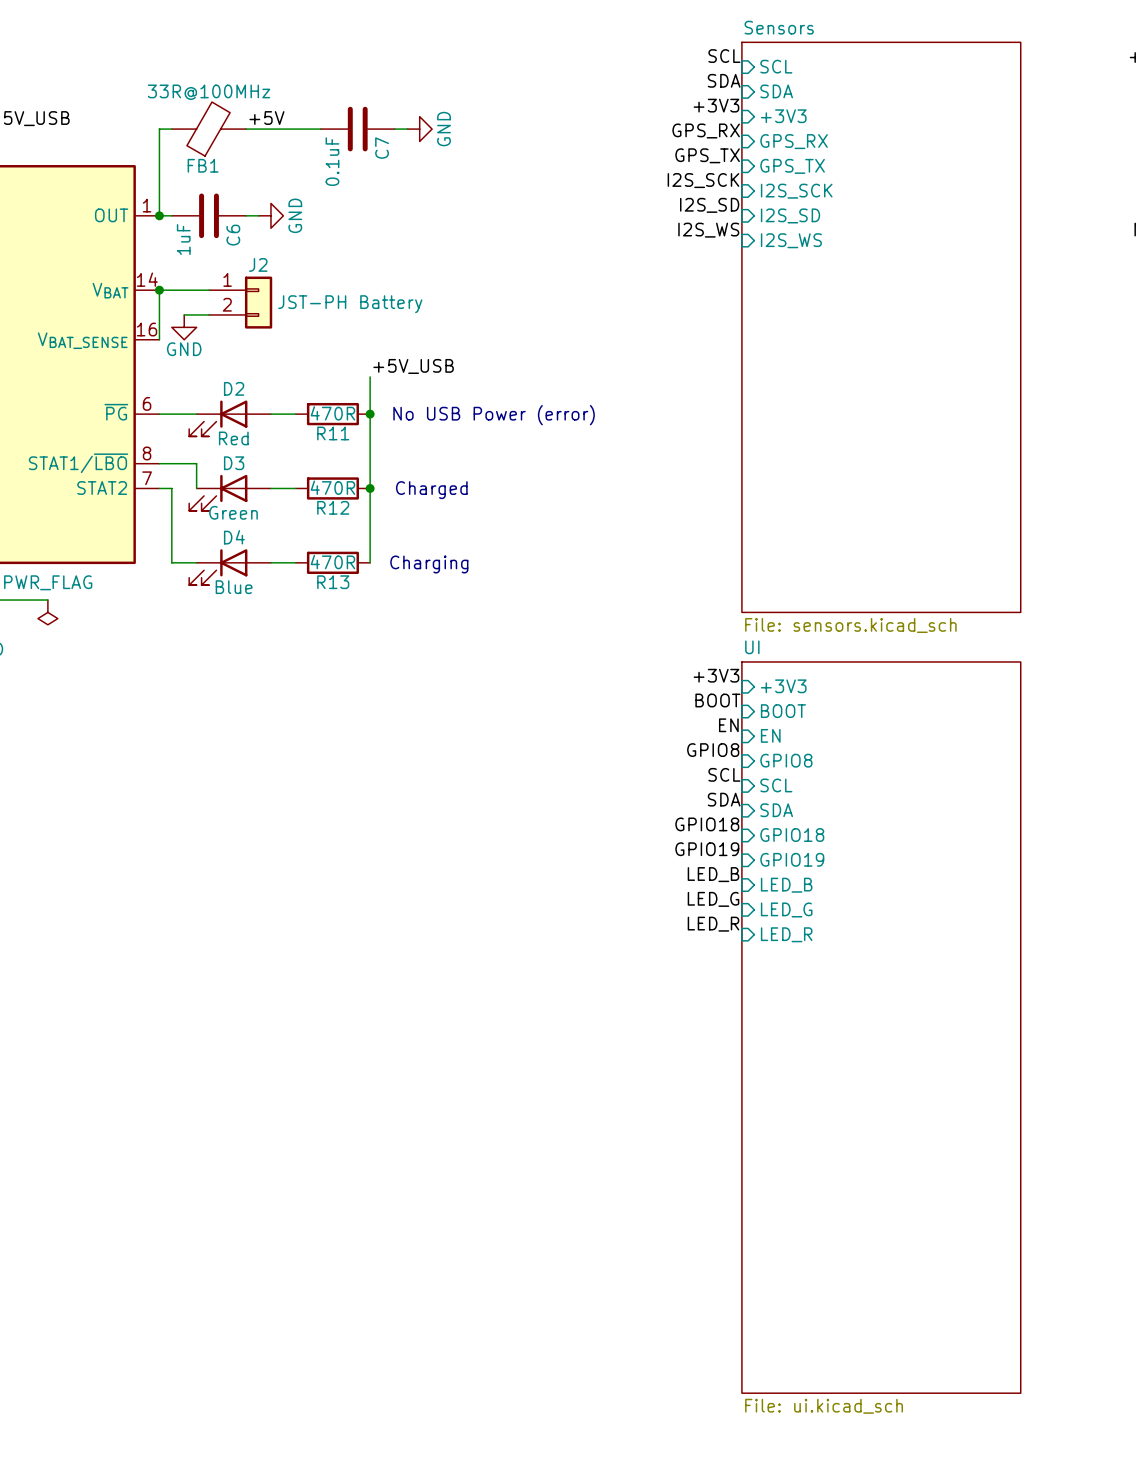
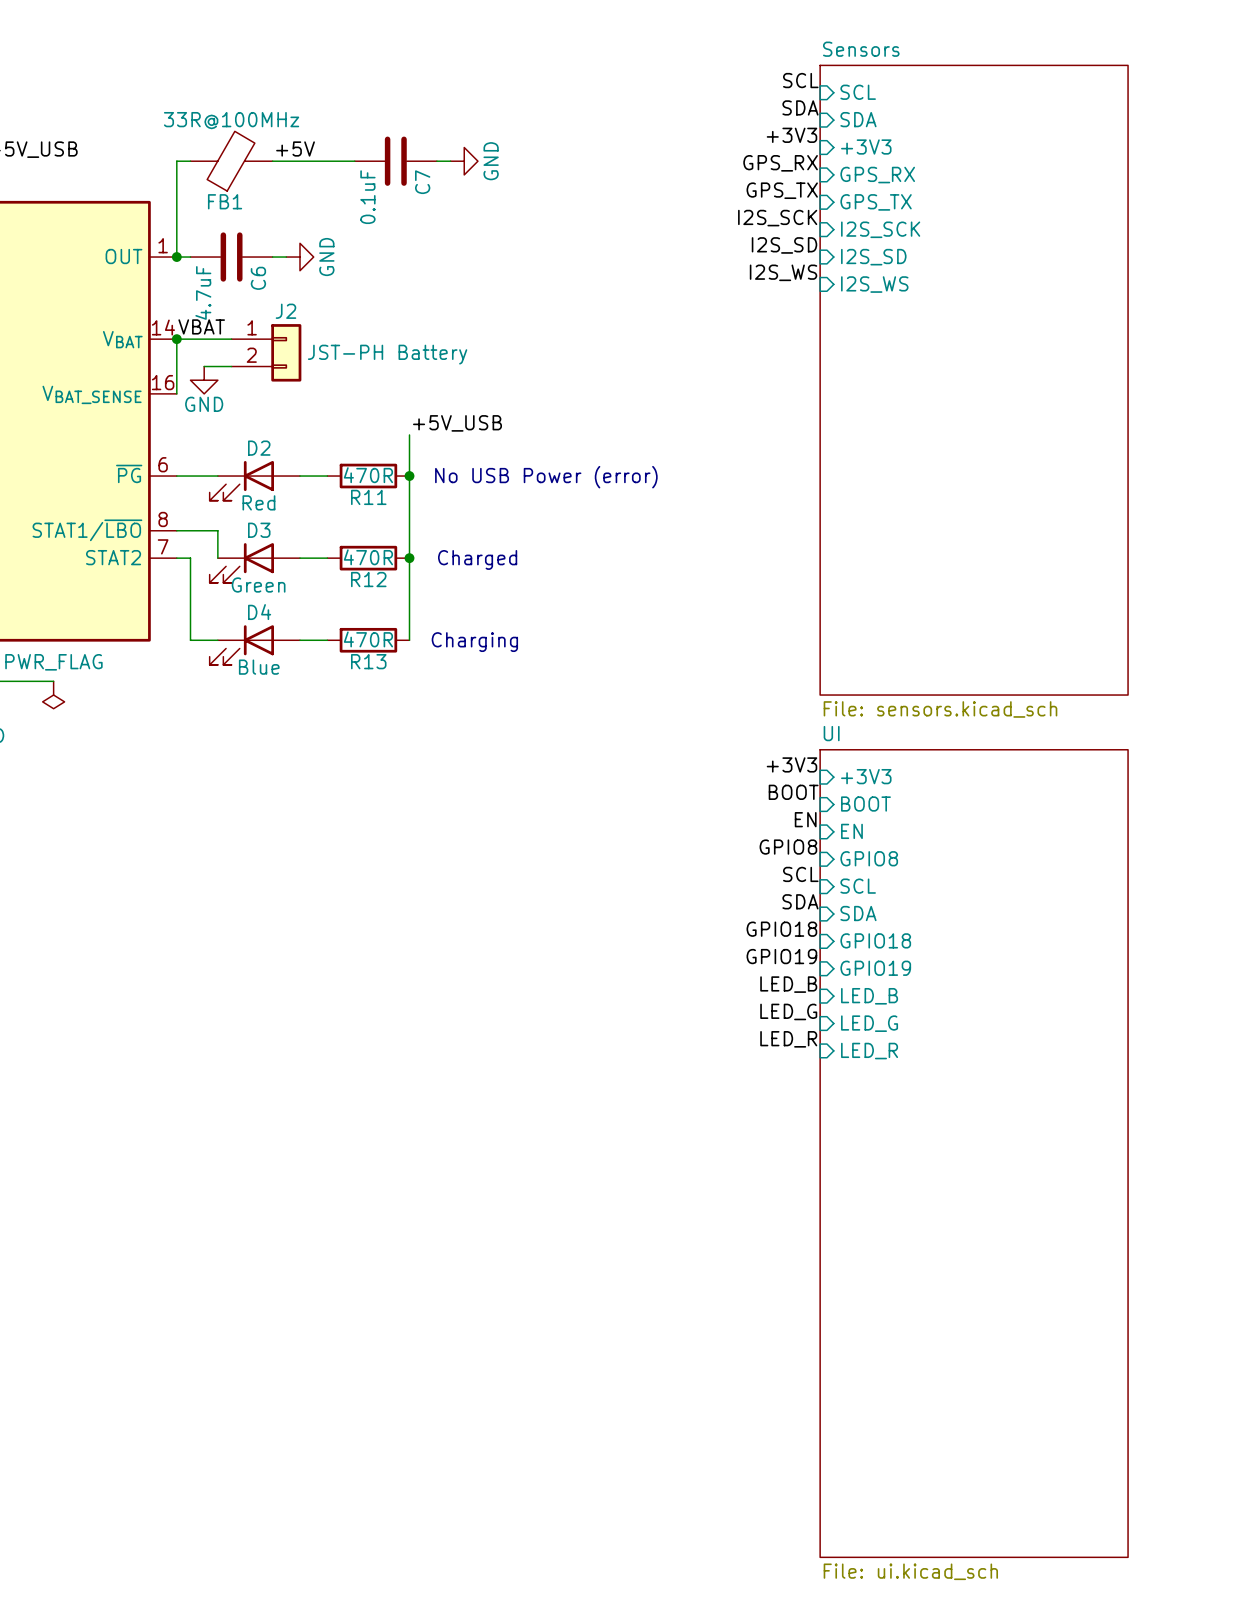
C6 value: 1uF (183, 239) -> 4.7uF (203, 292)
label: none -> VBAT (201, 326)

